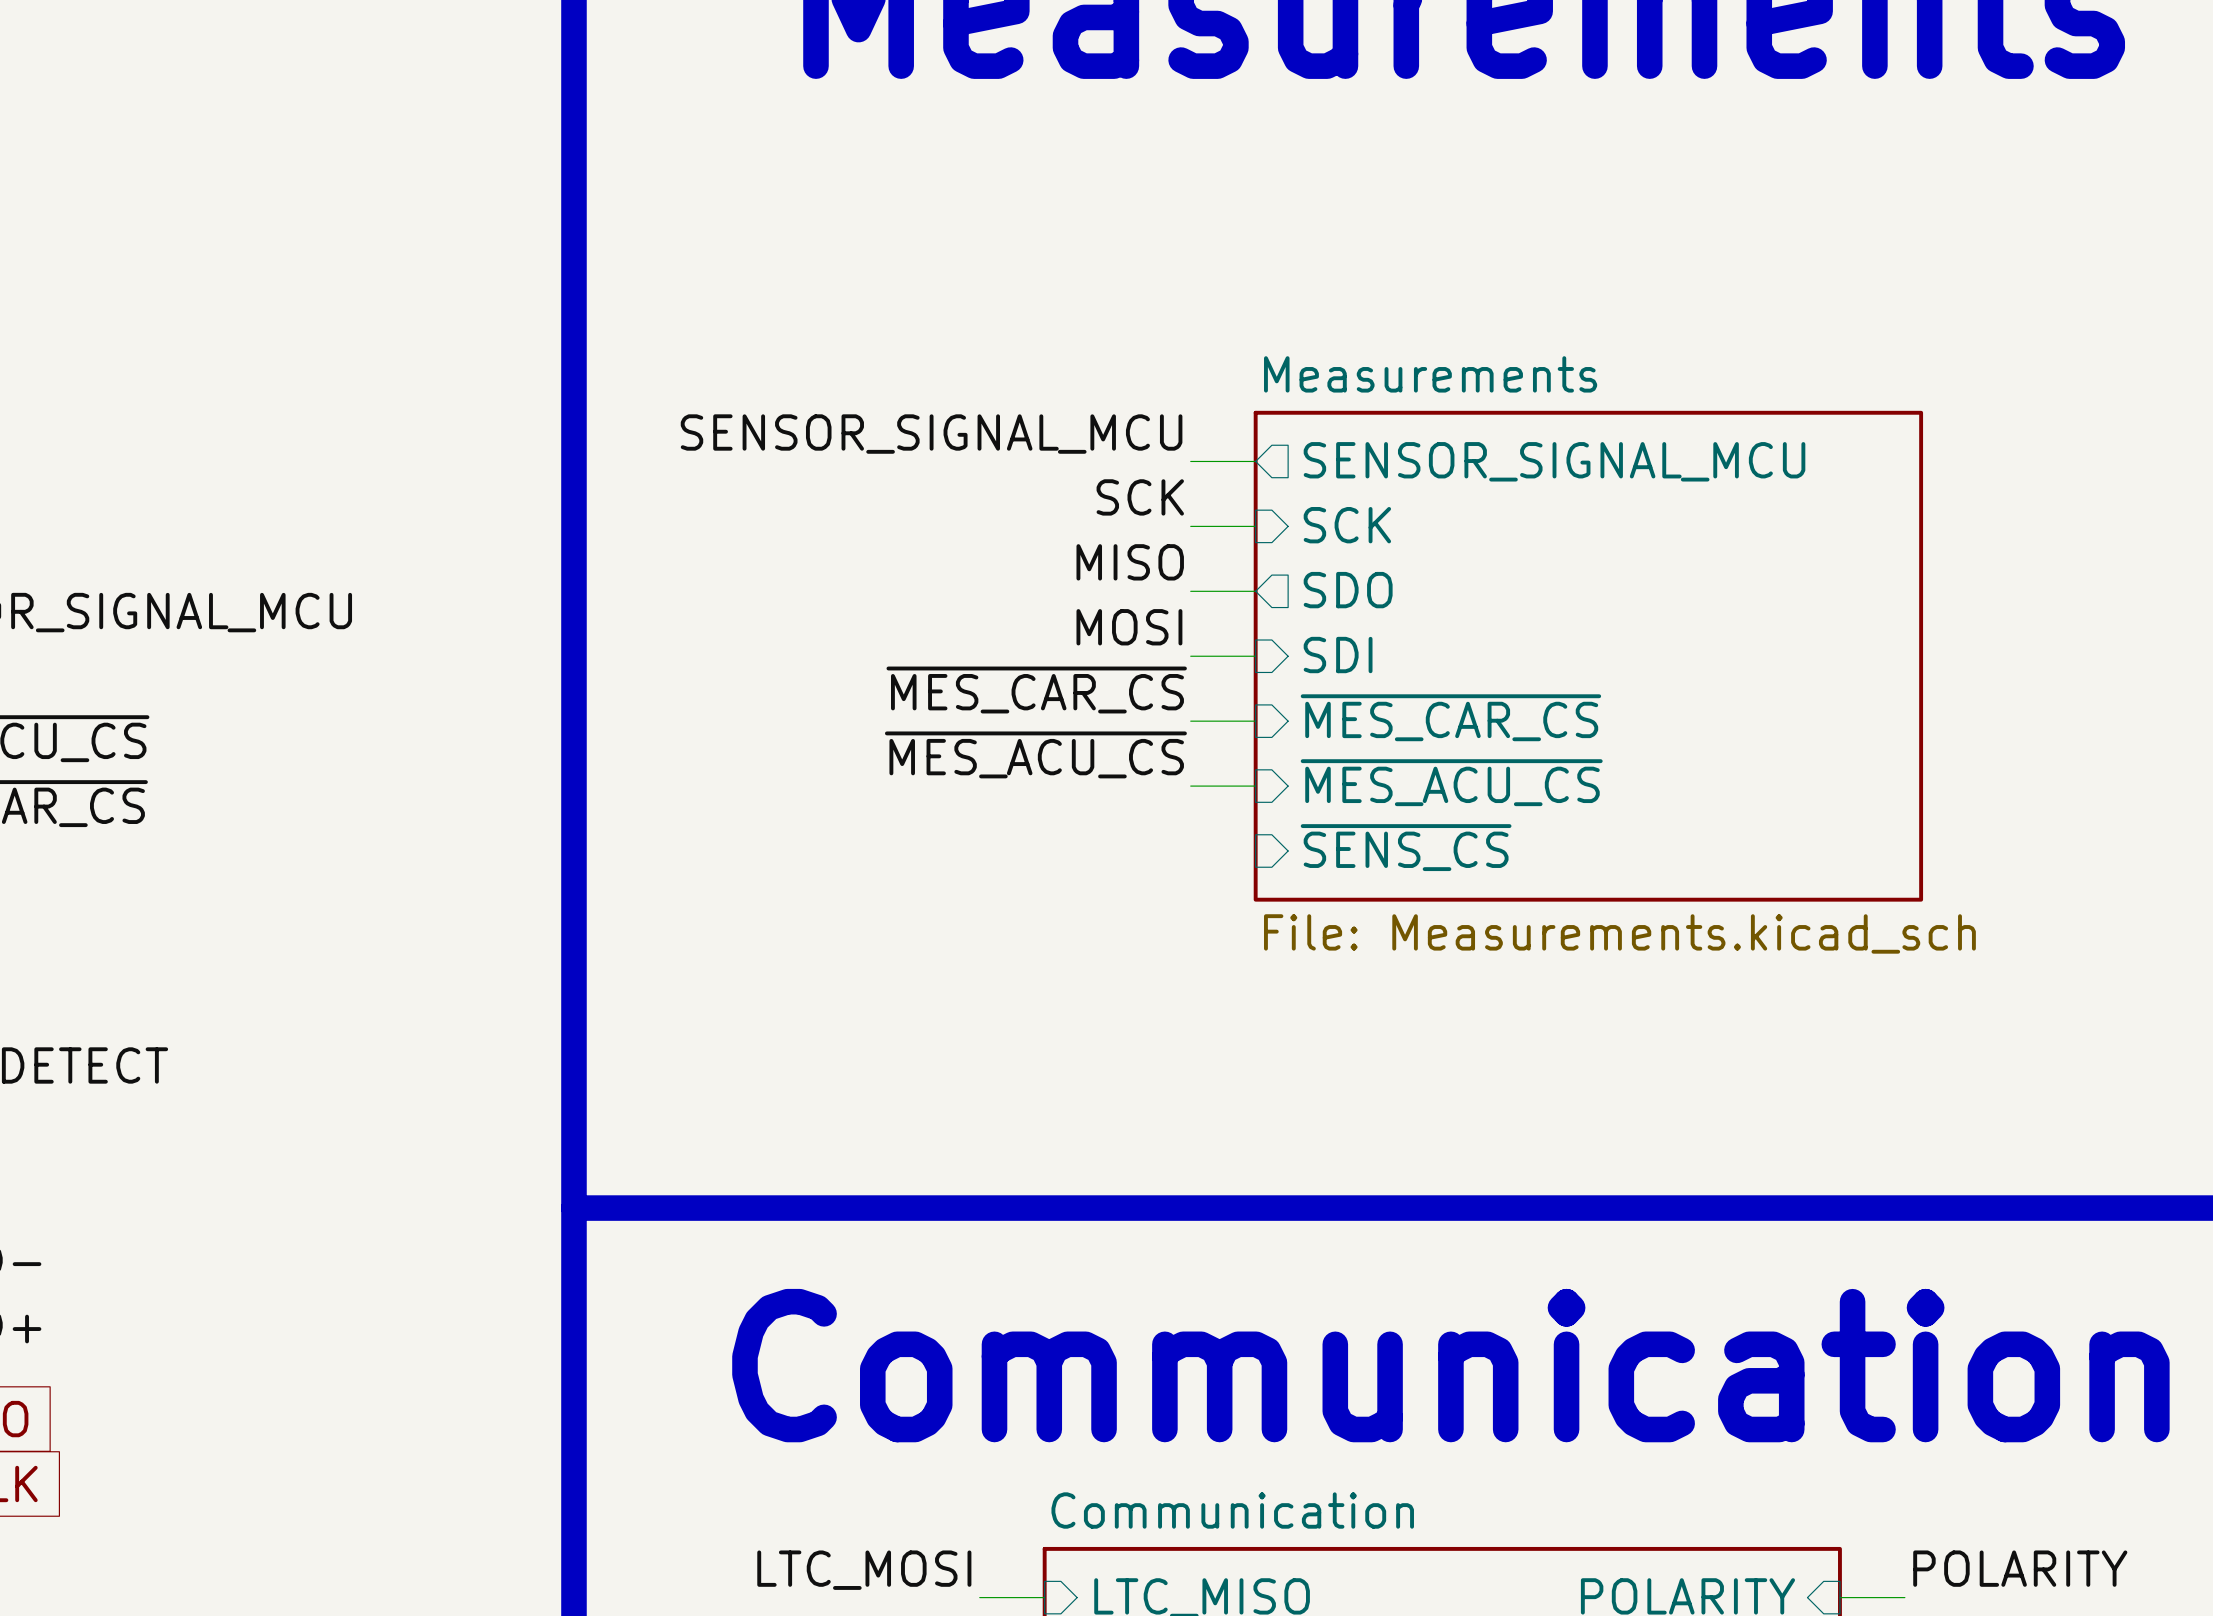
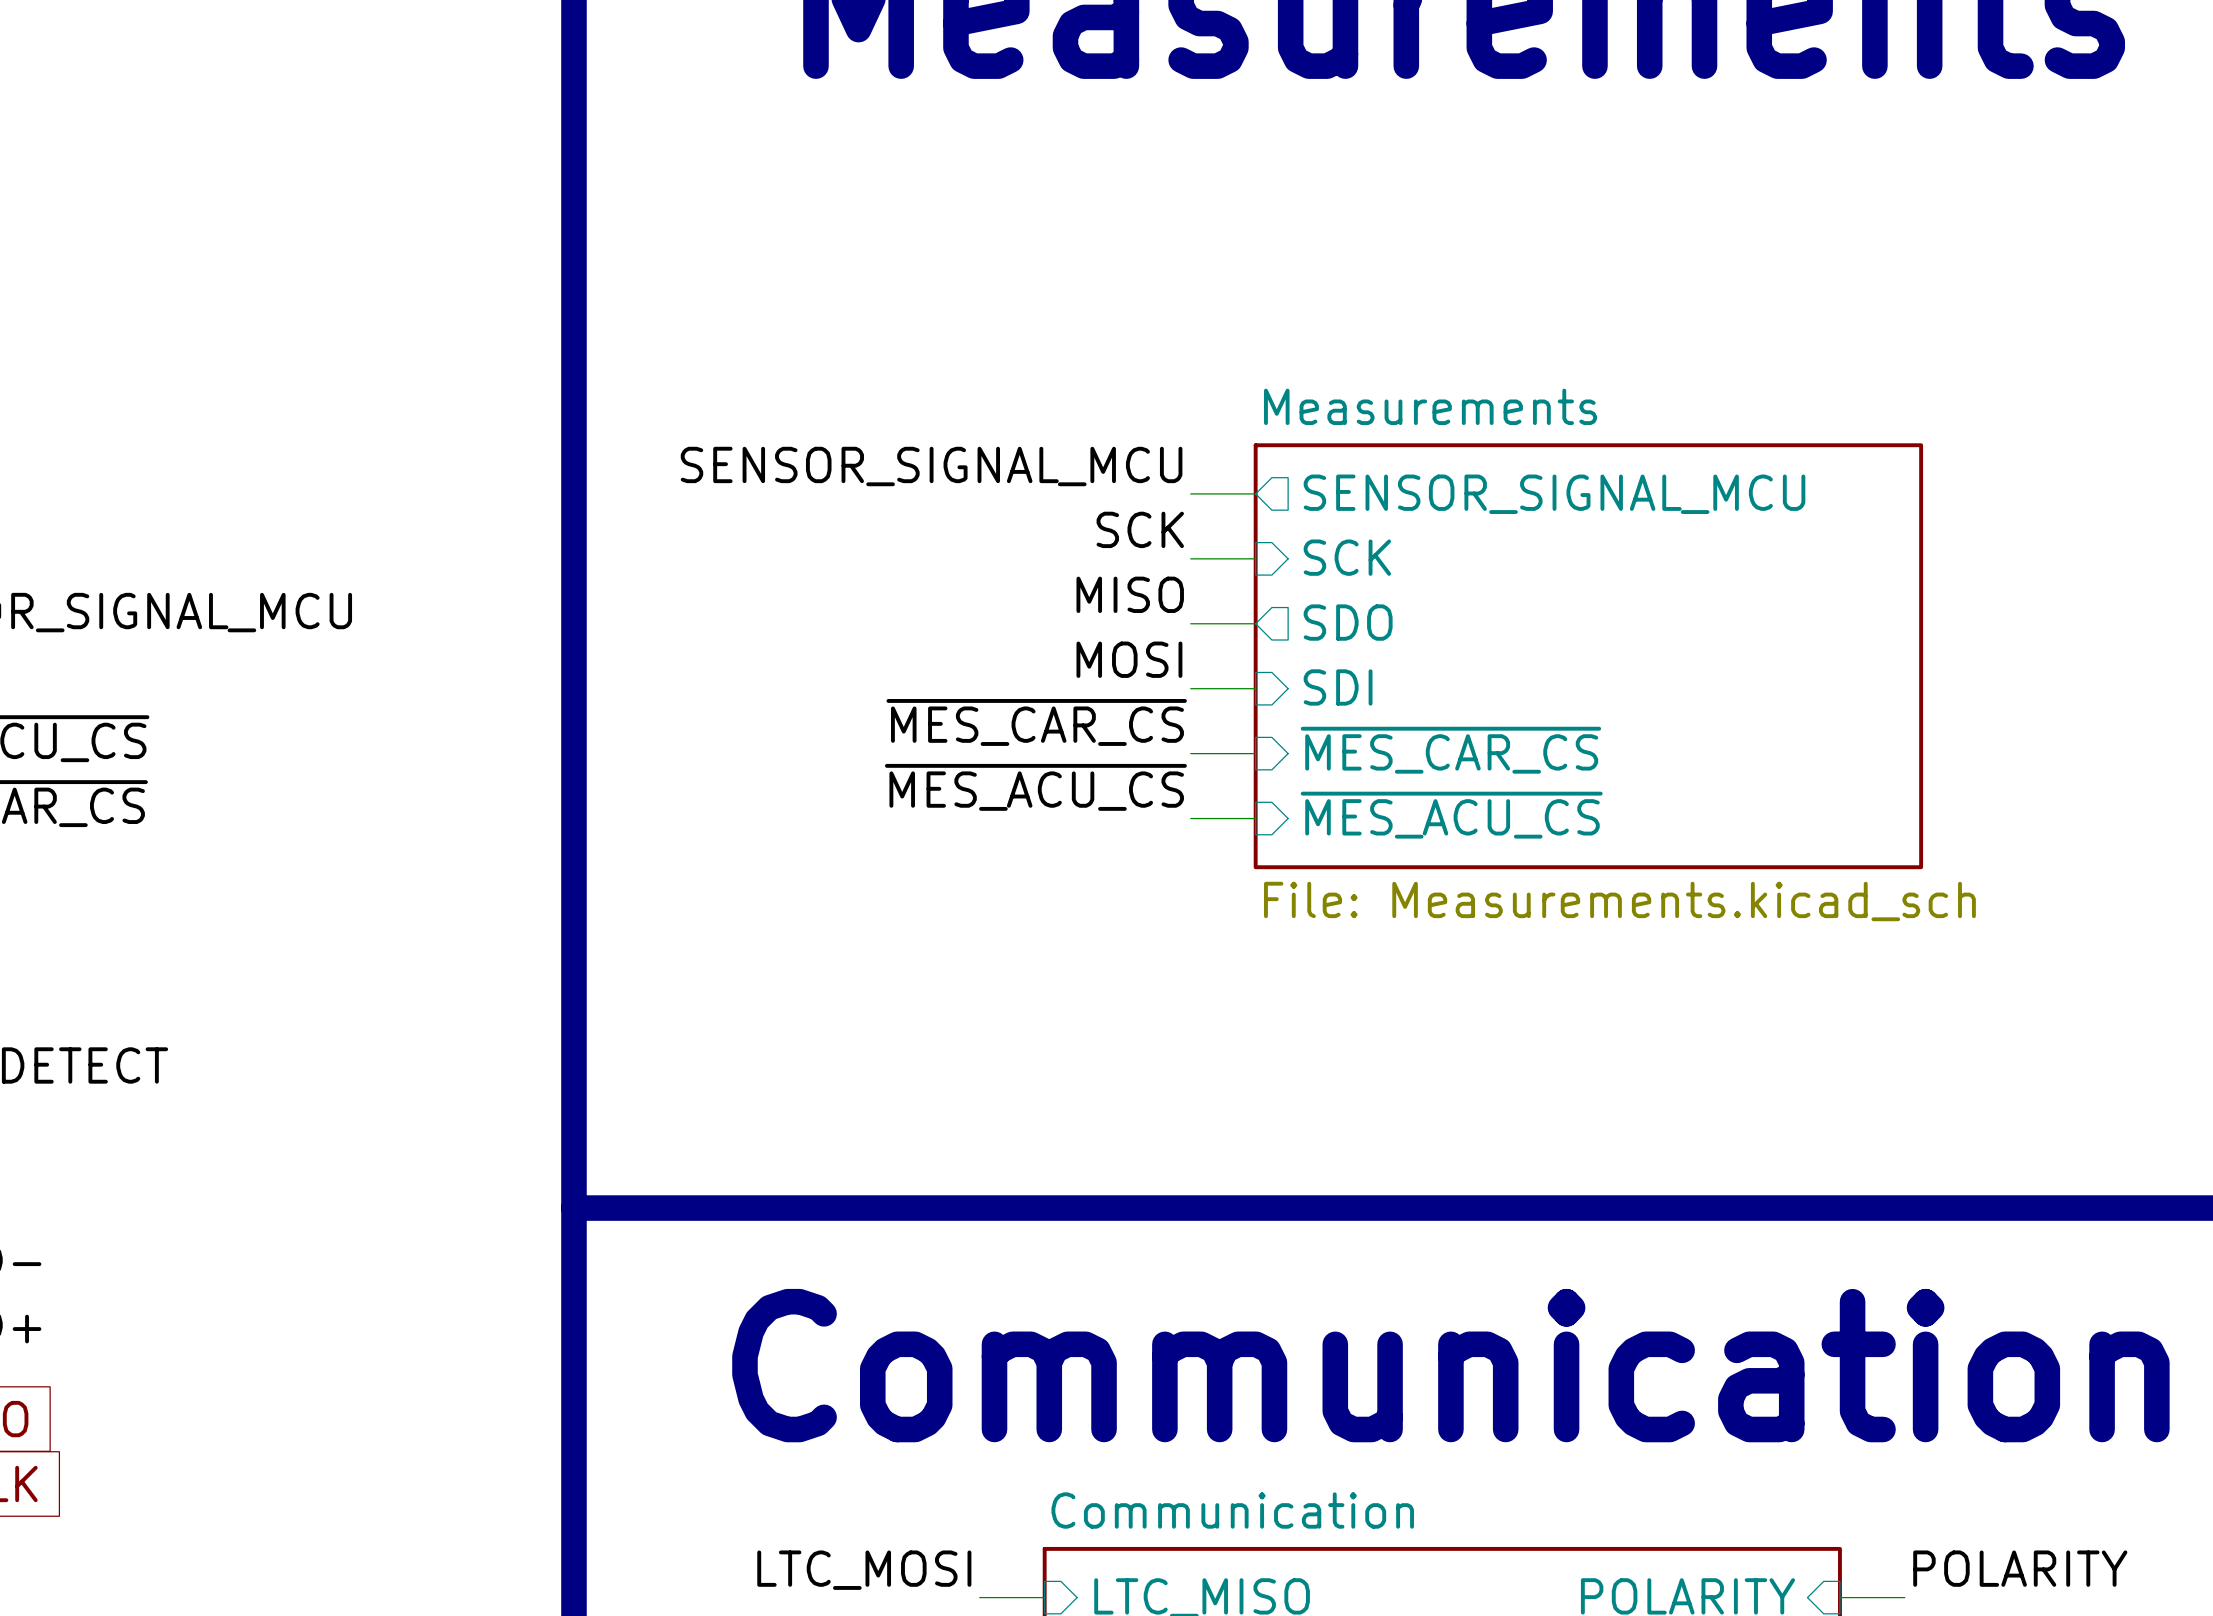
sheet Measurements shape: [1253, 410, 1924, 902] -> [1253, 443, 1924, 870]
label position: SENSOR_SIGNAL_MCU (931, 434) -> SENSOR_SIGNAL_MCU (931, 466)
wire: (1190, 461) (1255, 461) -> (1190, 493) (1255, 493)
sheet pin position: SENSOR_SIGNAL_MCU (1554, 461) -> SENSOR_SIGNAL_MCU (1554, 494)
label position: SCK (1140, 497) -> SCK (1140, 529)
sheet pin position: SCK (1347, 525) -> SCK (1347, 557)
wire: (1190, 526) (1255, 526) -> (1190, 558) (1255, 558)
label position: MISO (1130, 562) -> MISO (1130, 594)
sheet pin position: SDO (1348, 590) -> SDO (1348, 622)
wire: (1190, 591) (1255, 591) -> (1190, 623) (1255, 623)
label position: MOSI (1129, 627) -> MOSI (1129, 659)
sheet pin position: SDI (1338, 655) -> SDI (1338, 687)
wire: (1190, 656) (1255, 656) -> (1190, 688) (1255, 688)
label position: ~{MES_CAR_CS} (1036, 690) -> ~{MES_CAR_CS} (1036, 722)
sheet pin position: ~{MES_CAR_CS} (1450, 717) -> ~{MES_CAR_CS} (1450, 750)
wire: (1190, 721) (1255, 721) -> (1190, 753) (1255, 753)
label position: ~{MES_ACU_CS} (1035, 754) -> ~{MES_ACU_CS} (1035, 787)
sheet pin position: ~{MES_ACU_CS} (1451, 782) -> ~{MES_ACU_CS} (1451, 815)
wire: (1190, 786) (1255, 786) -> (1190, 818) (1255, 818)
sheet pin: ~{SENS_CS} (1406, 847) -> none

